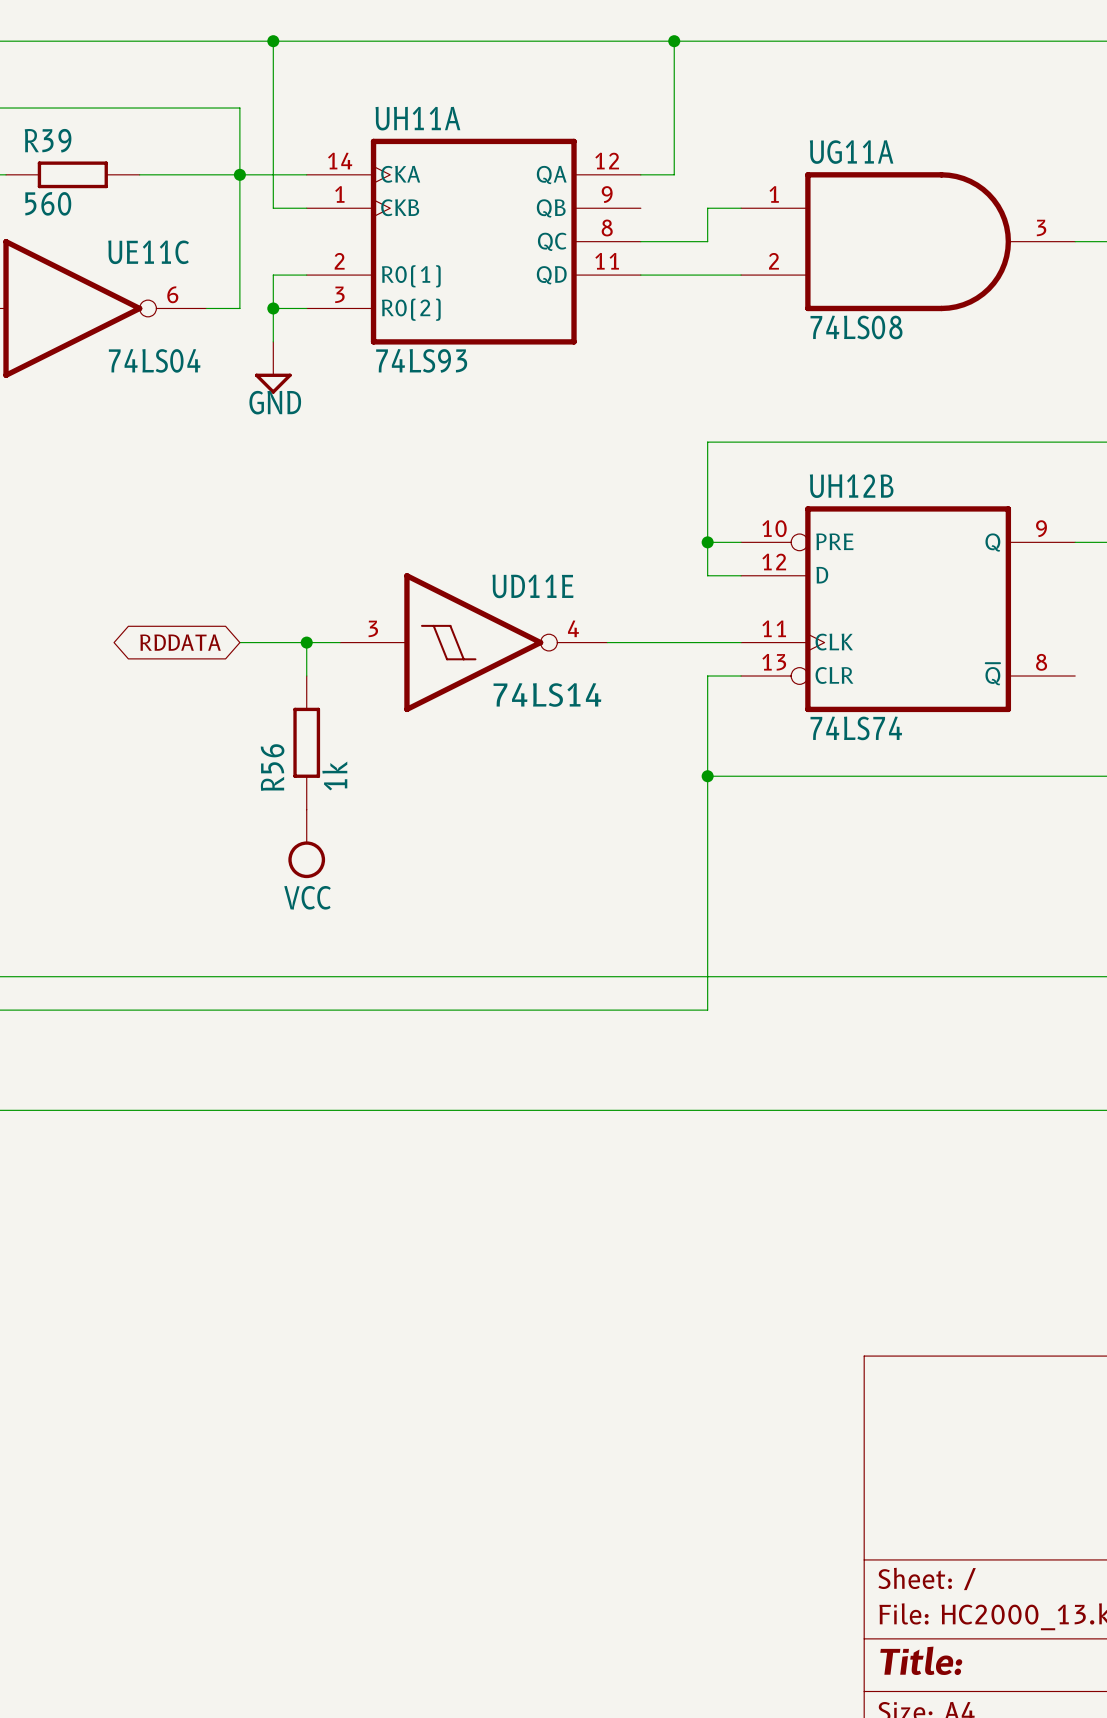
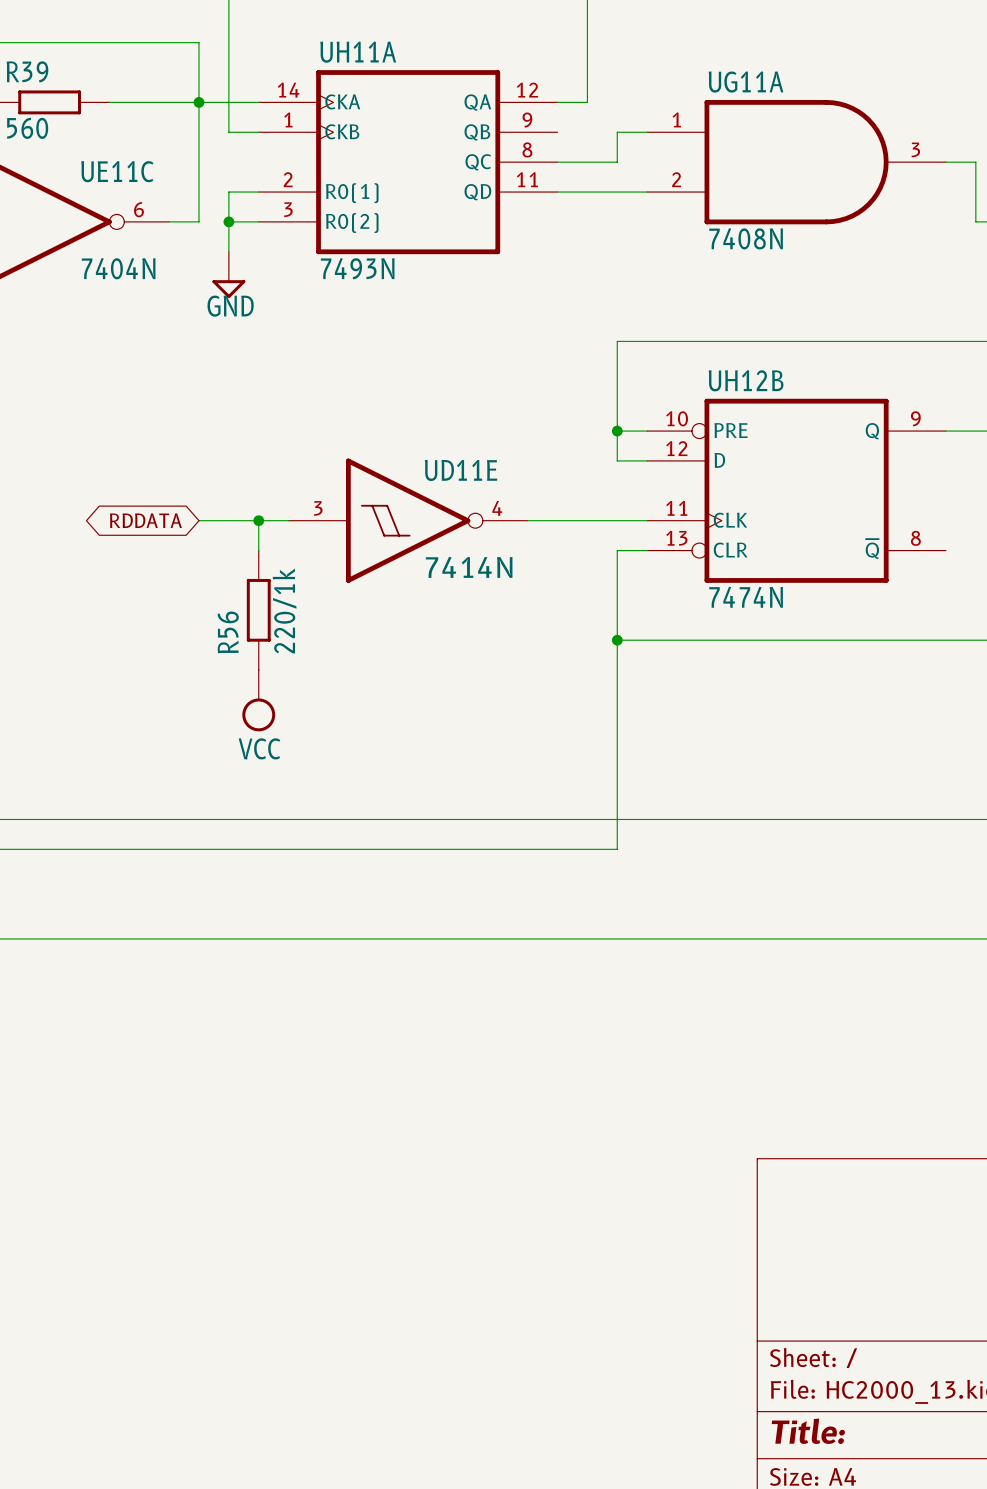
UG11A value: 74LS08 (856, 327) -> 7408N (746, 238)
UE11C value: 74LS04 (154, 360) -> 7404N (118, 268)
UH11A value: 74LS93 (421, 360) -> 7493N (357, 268)
UD11E value: 74LS14 (547, 694) -> 7414N (469, 567)
UH12B value: 74LS74 (856, 728) -> 7474N (746, 597)
R56 value: 1k (334, 775) -> 220/1k (284, 610)

